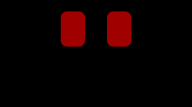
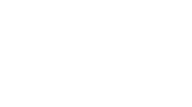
part: (96, 29) -> none

